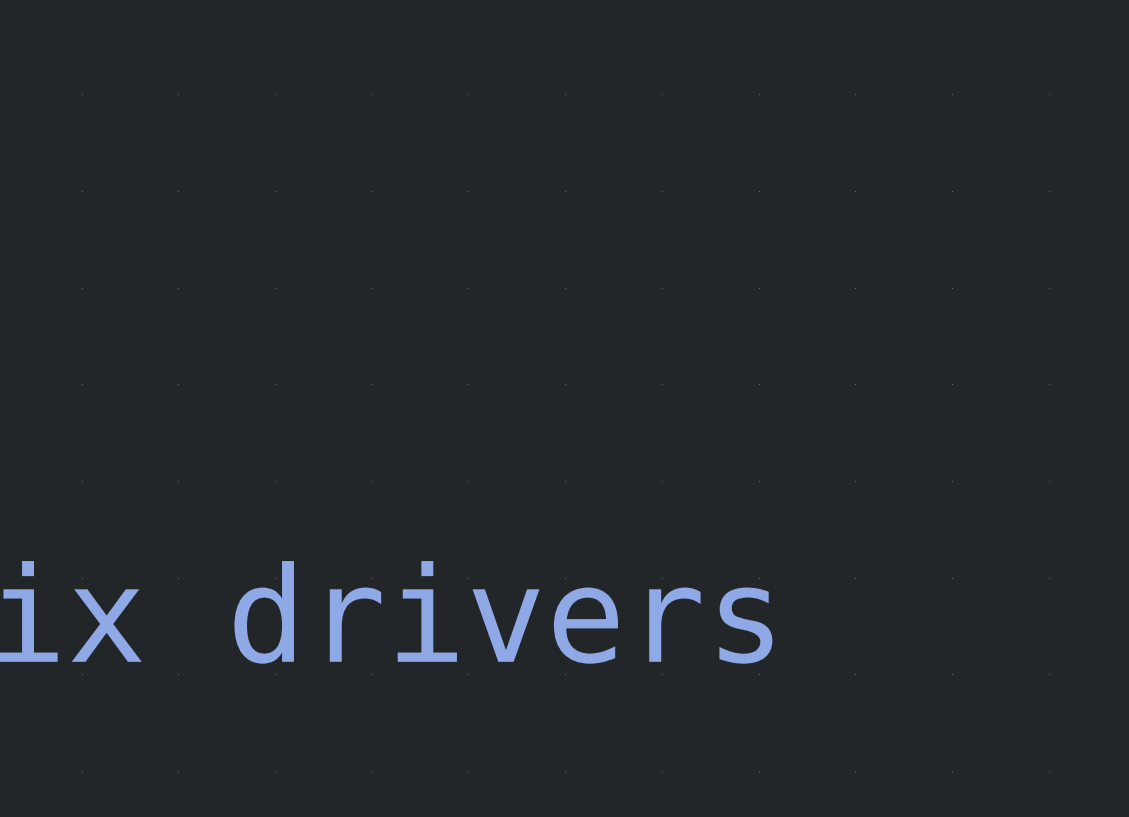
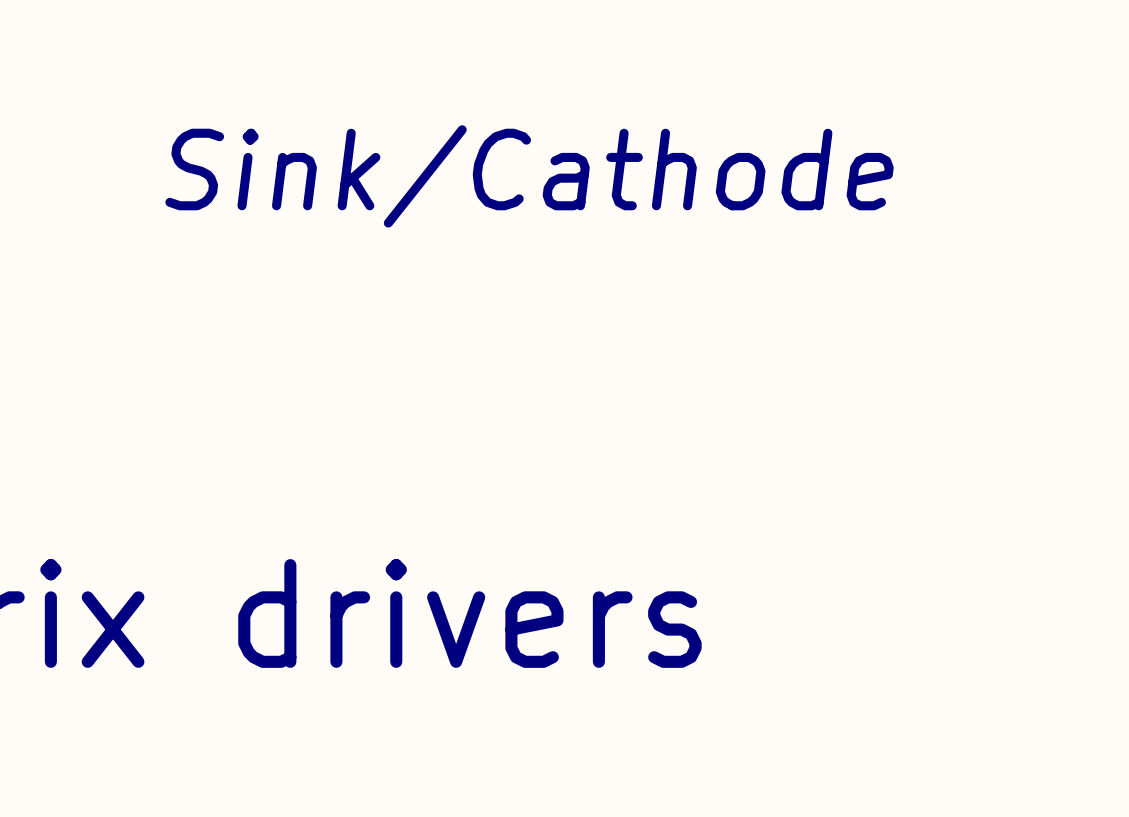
text: none -> Sink/Cathode (529, 176)

